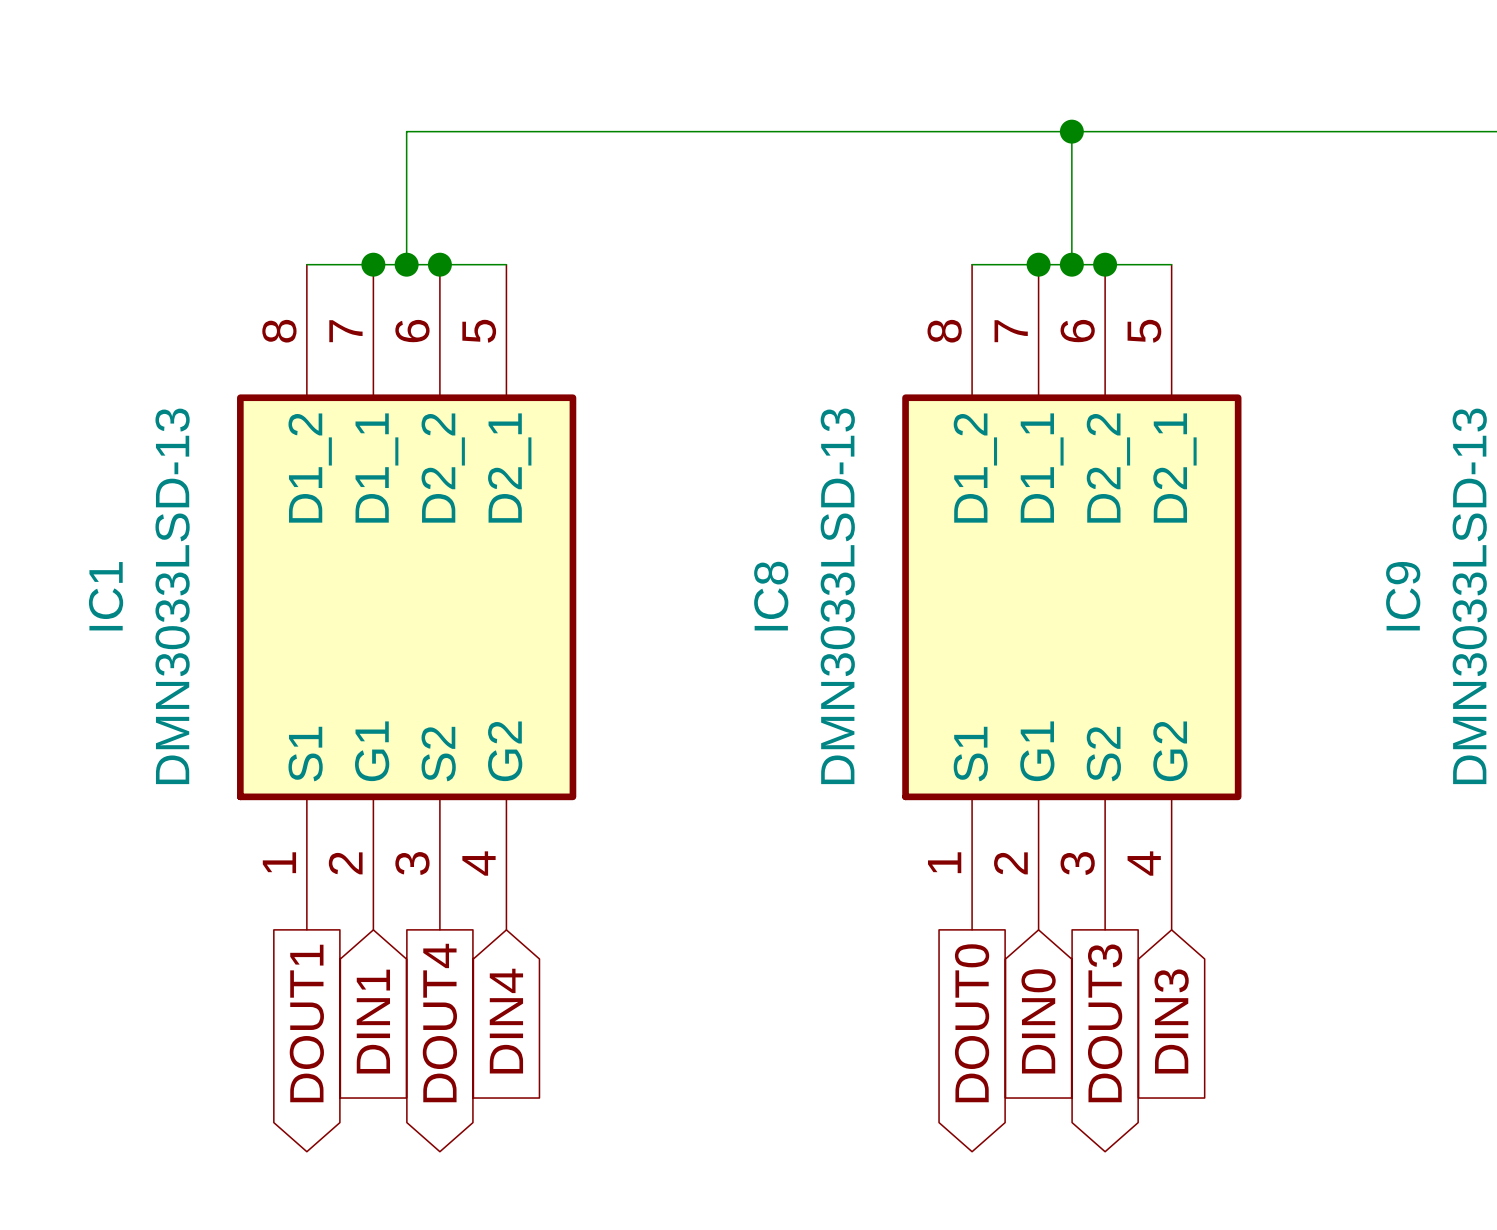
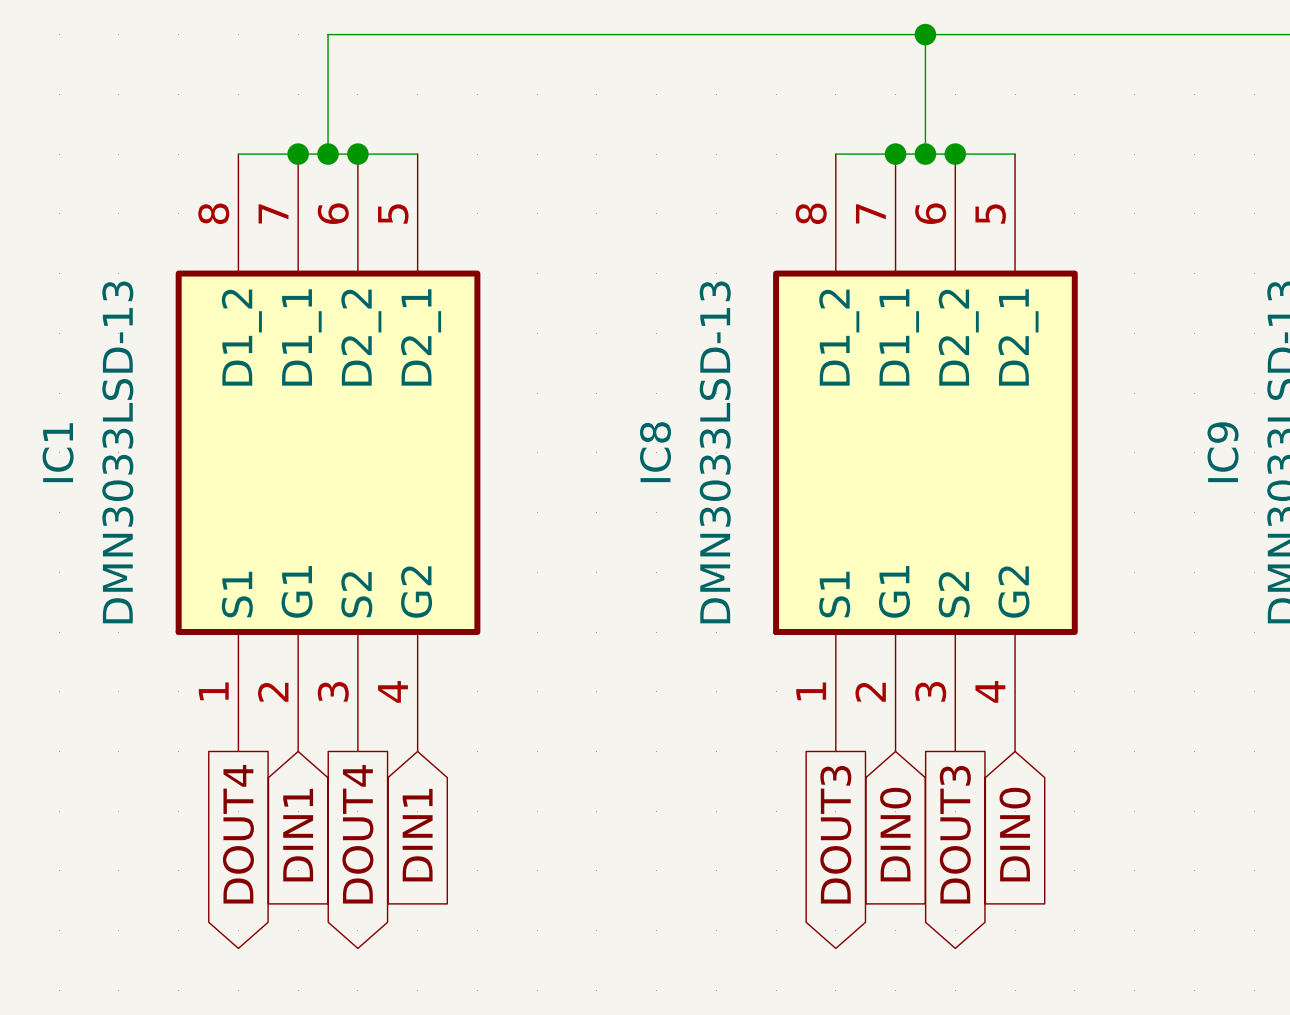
global label: DIN4 (506, 1021) -> DIN1 (417, 835)
global label: DIN3 (1171, 1021) -> DIN0 (1015, 834)
global label: DOUT1 (306, 1023) -> DOUT4 (238, 834)
global label: DOUT0 (972, 1023) -> DOUT3 (835, 834)

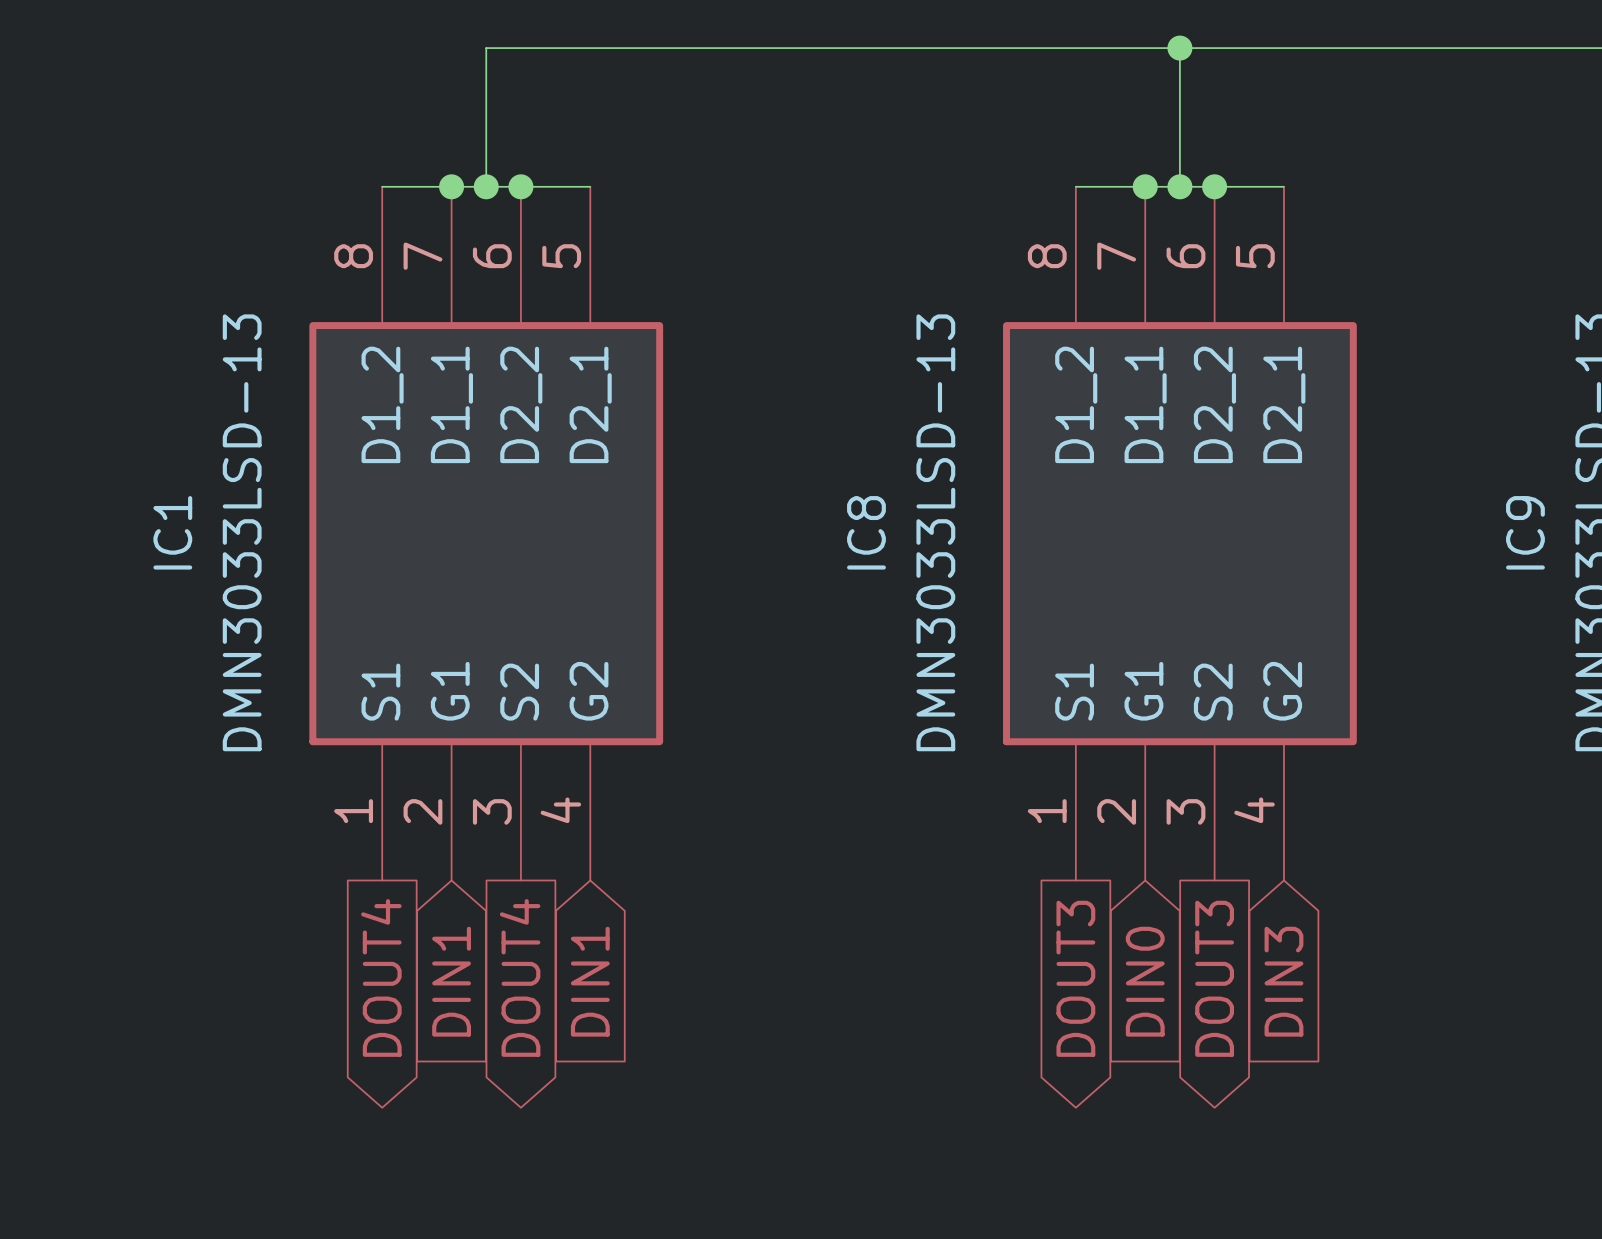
global label: DIN0 (1015, 834) -> DIN3 (1283, 981)

